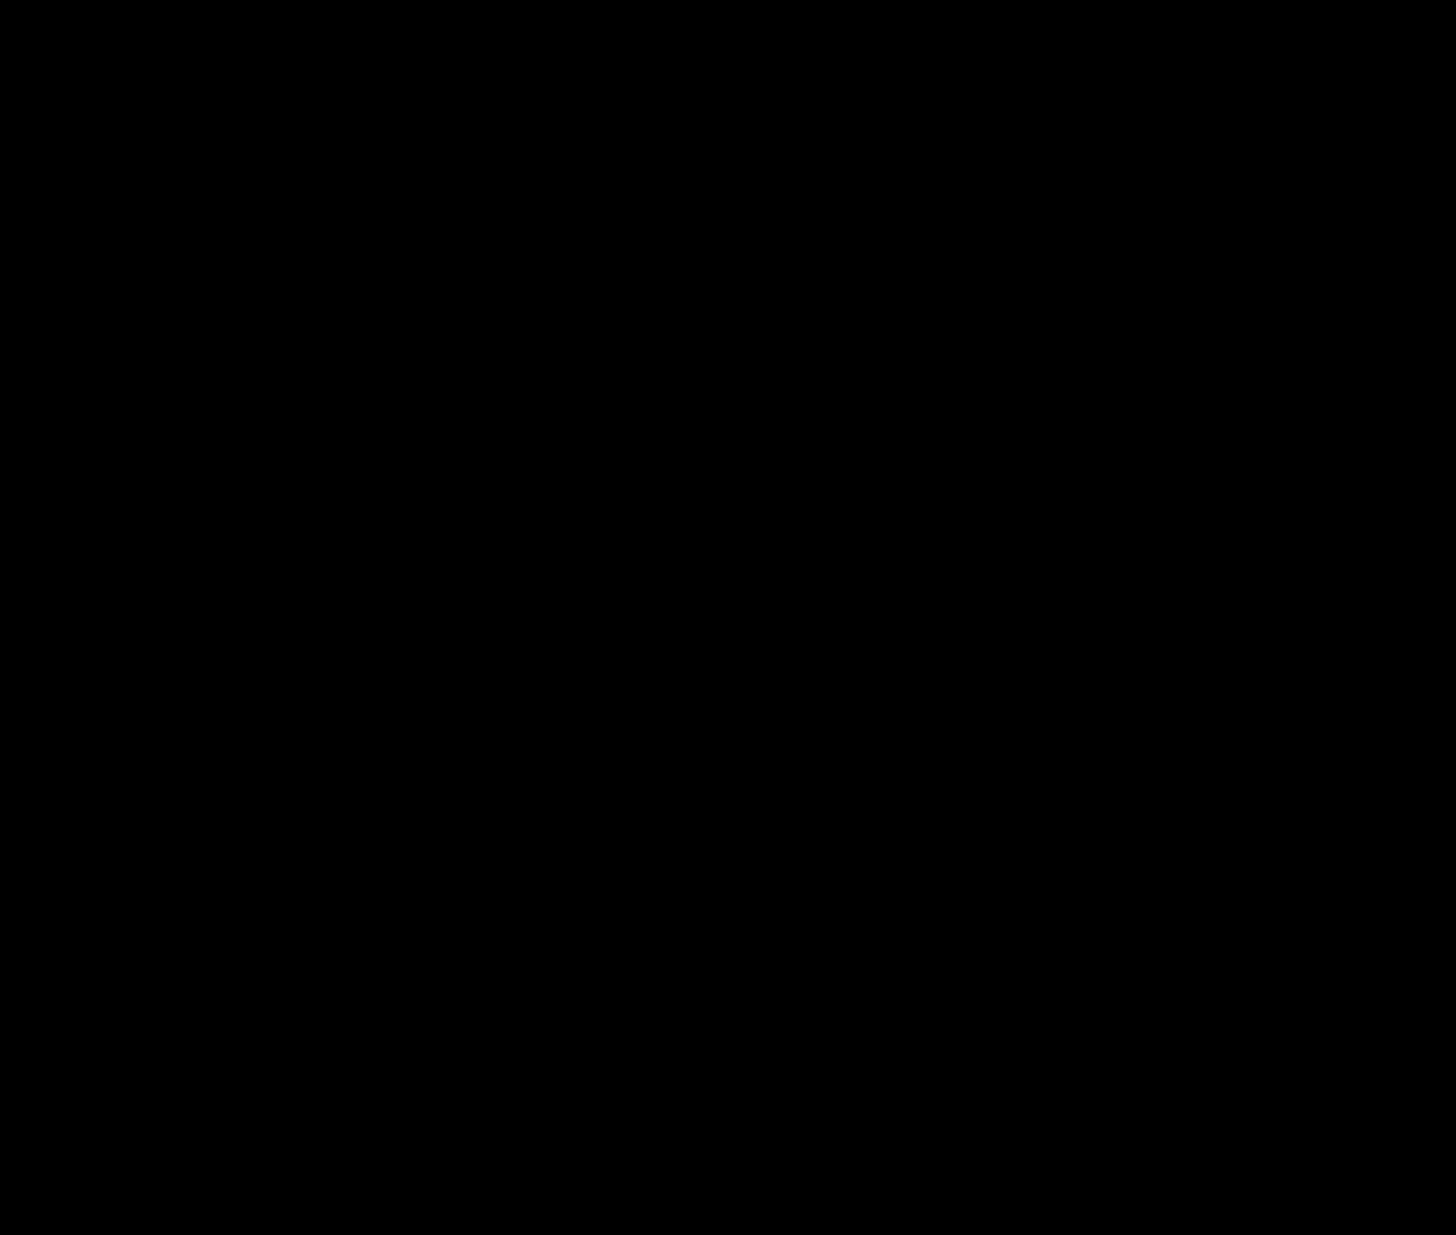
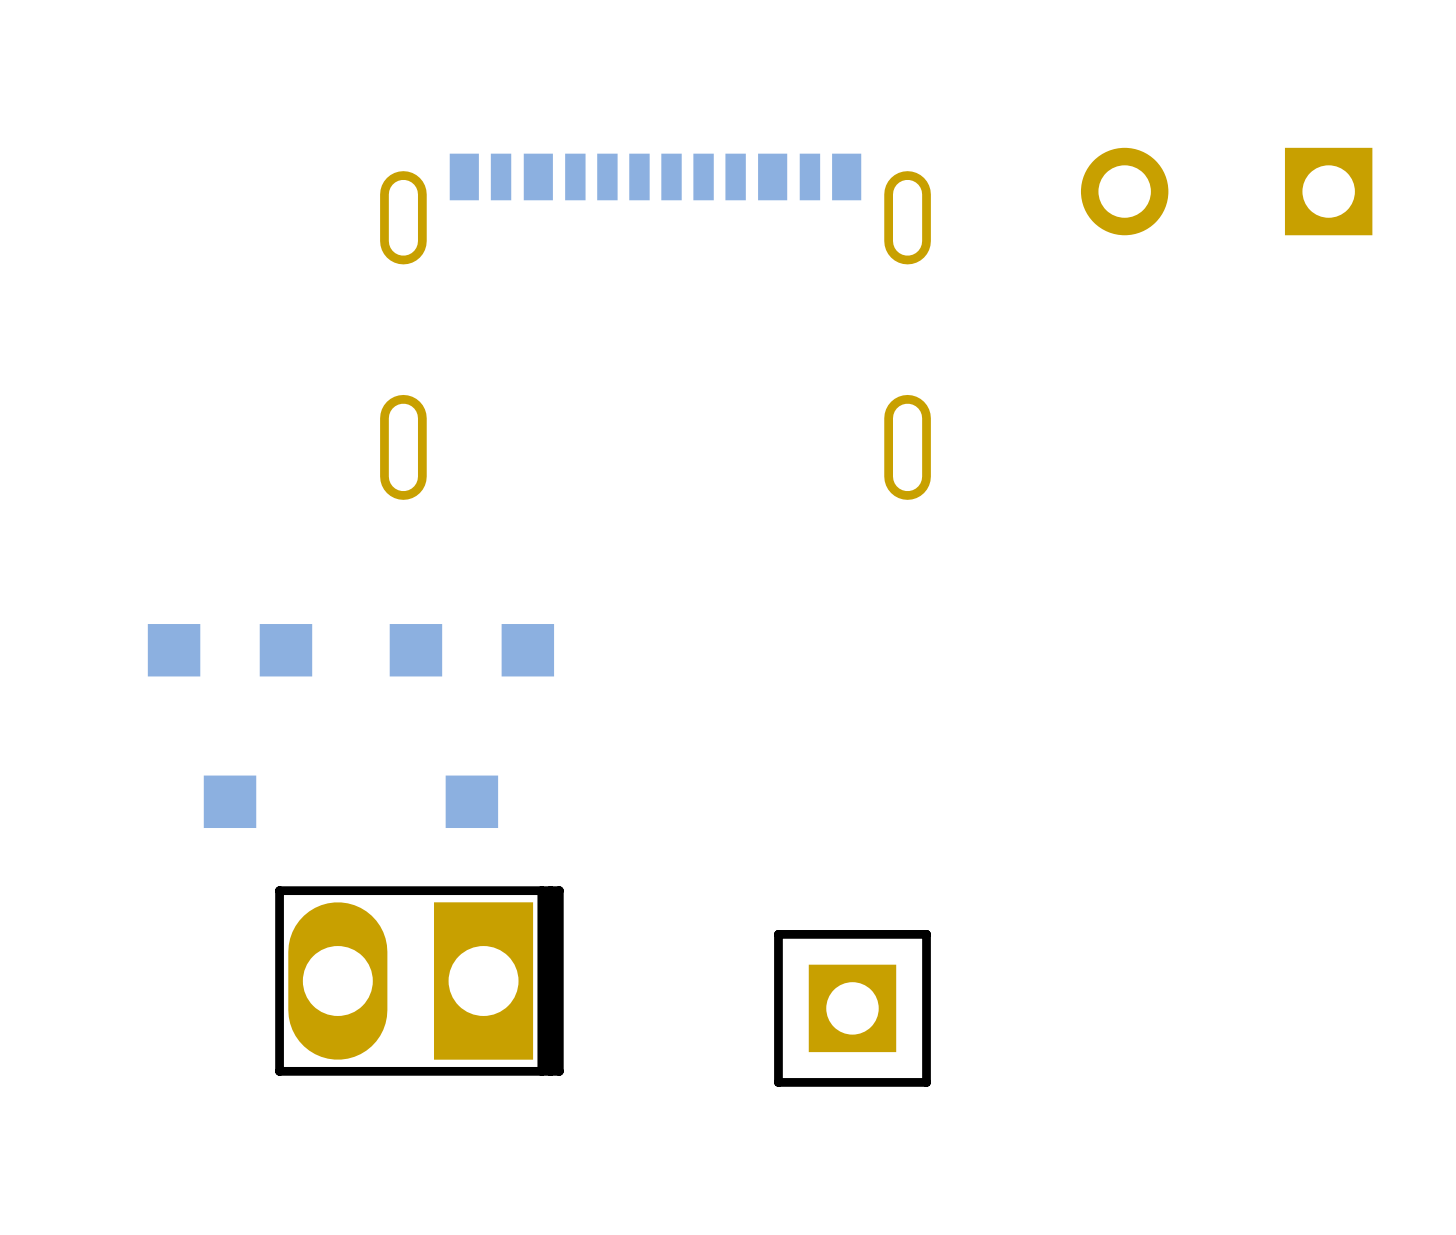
part: none -> (1226, 191)
part: none -> (655, 326)
part: none -> (230, 726)
part: none -> (471, 726)
part: none -> (419, 981)
part: none -> (852, 1008)

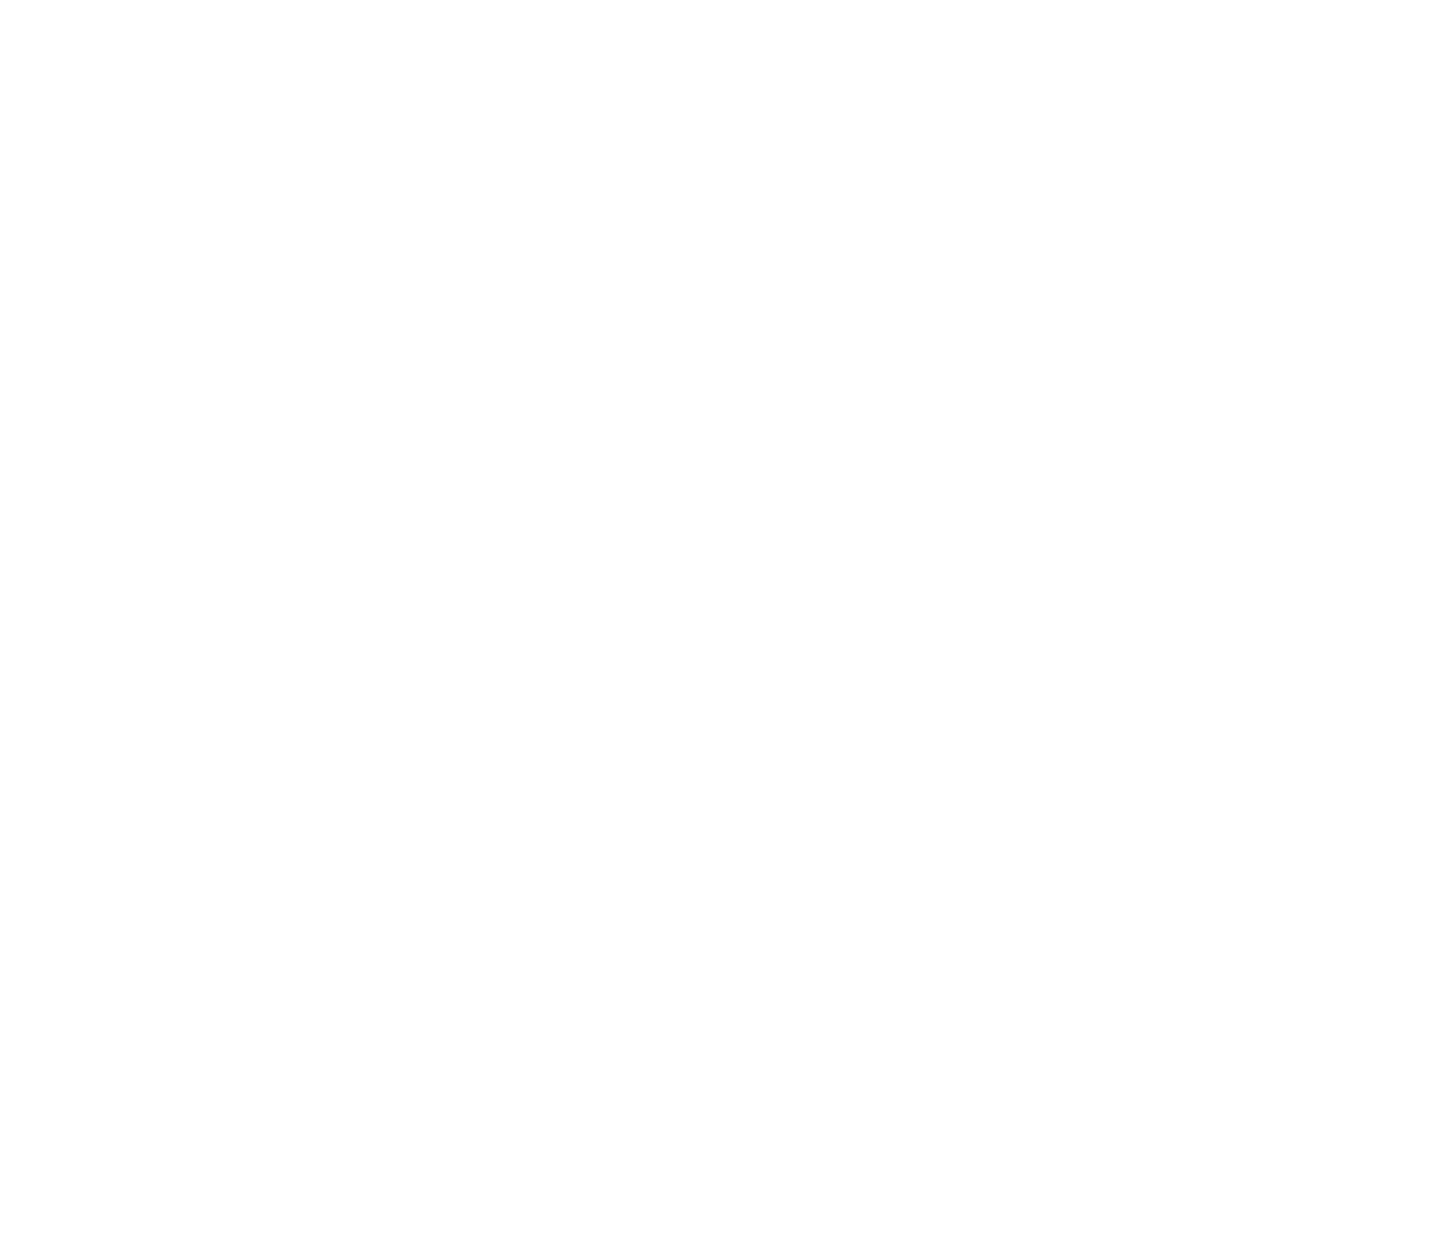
part: (1226, 191) -> none
part: (655, 326) -> none
part: (230, 726) -> none
part: (471, 726) -> none
part: (419, 981) -> none
part: (852, 1008) -> none

